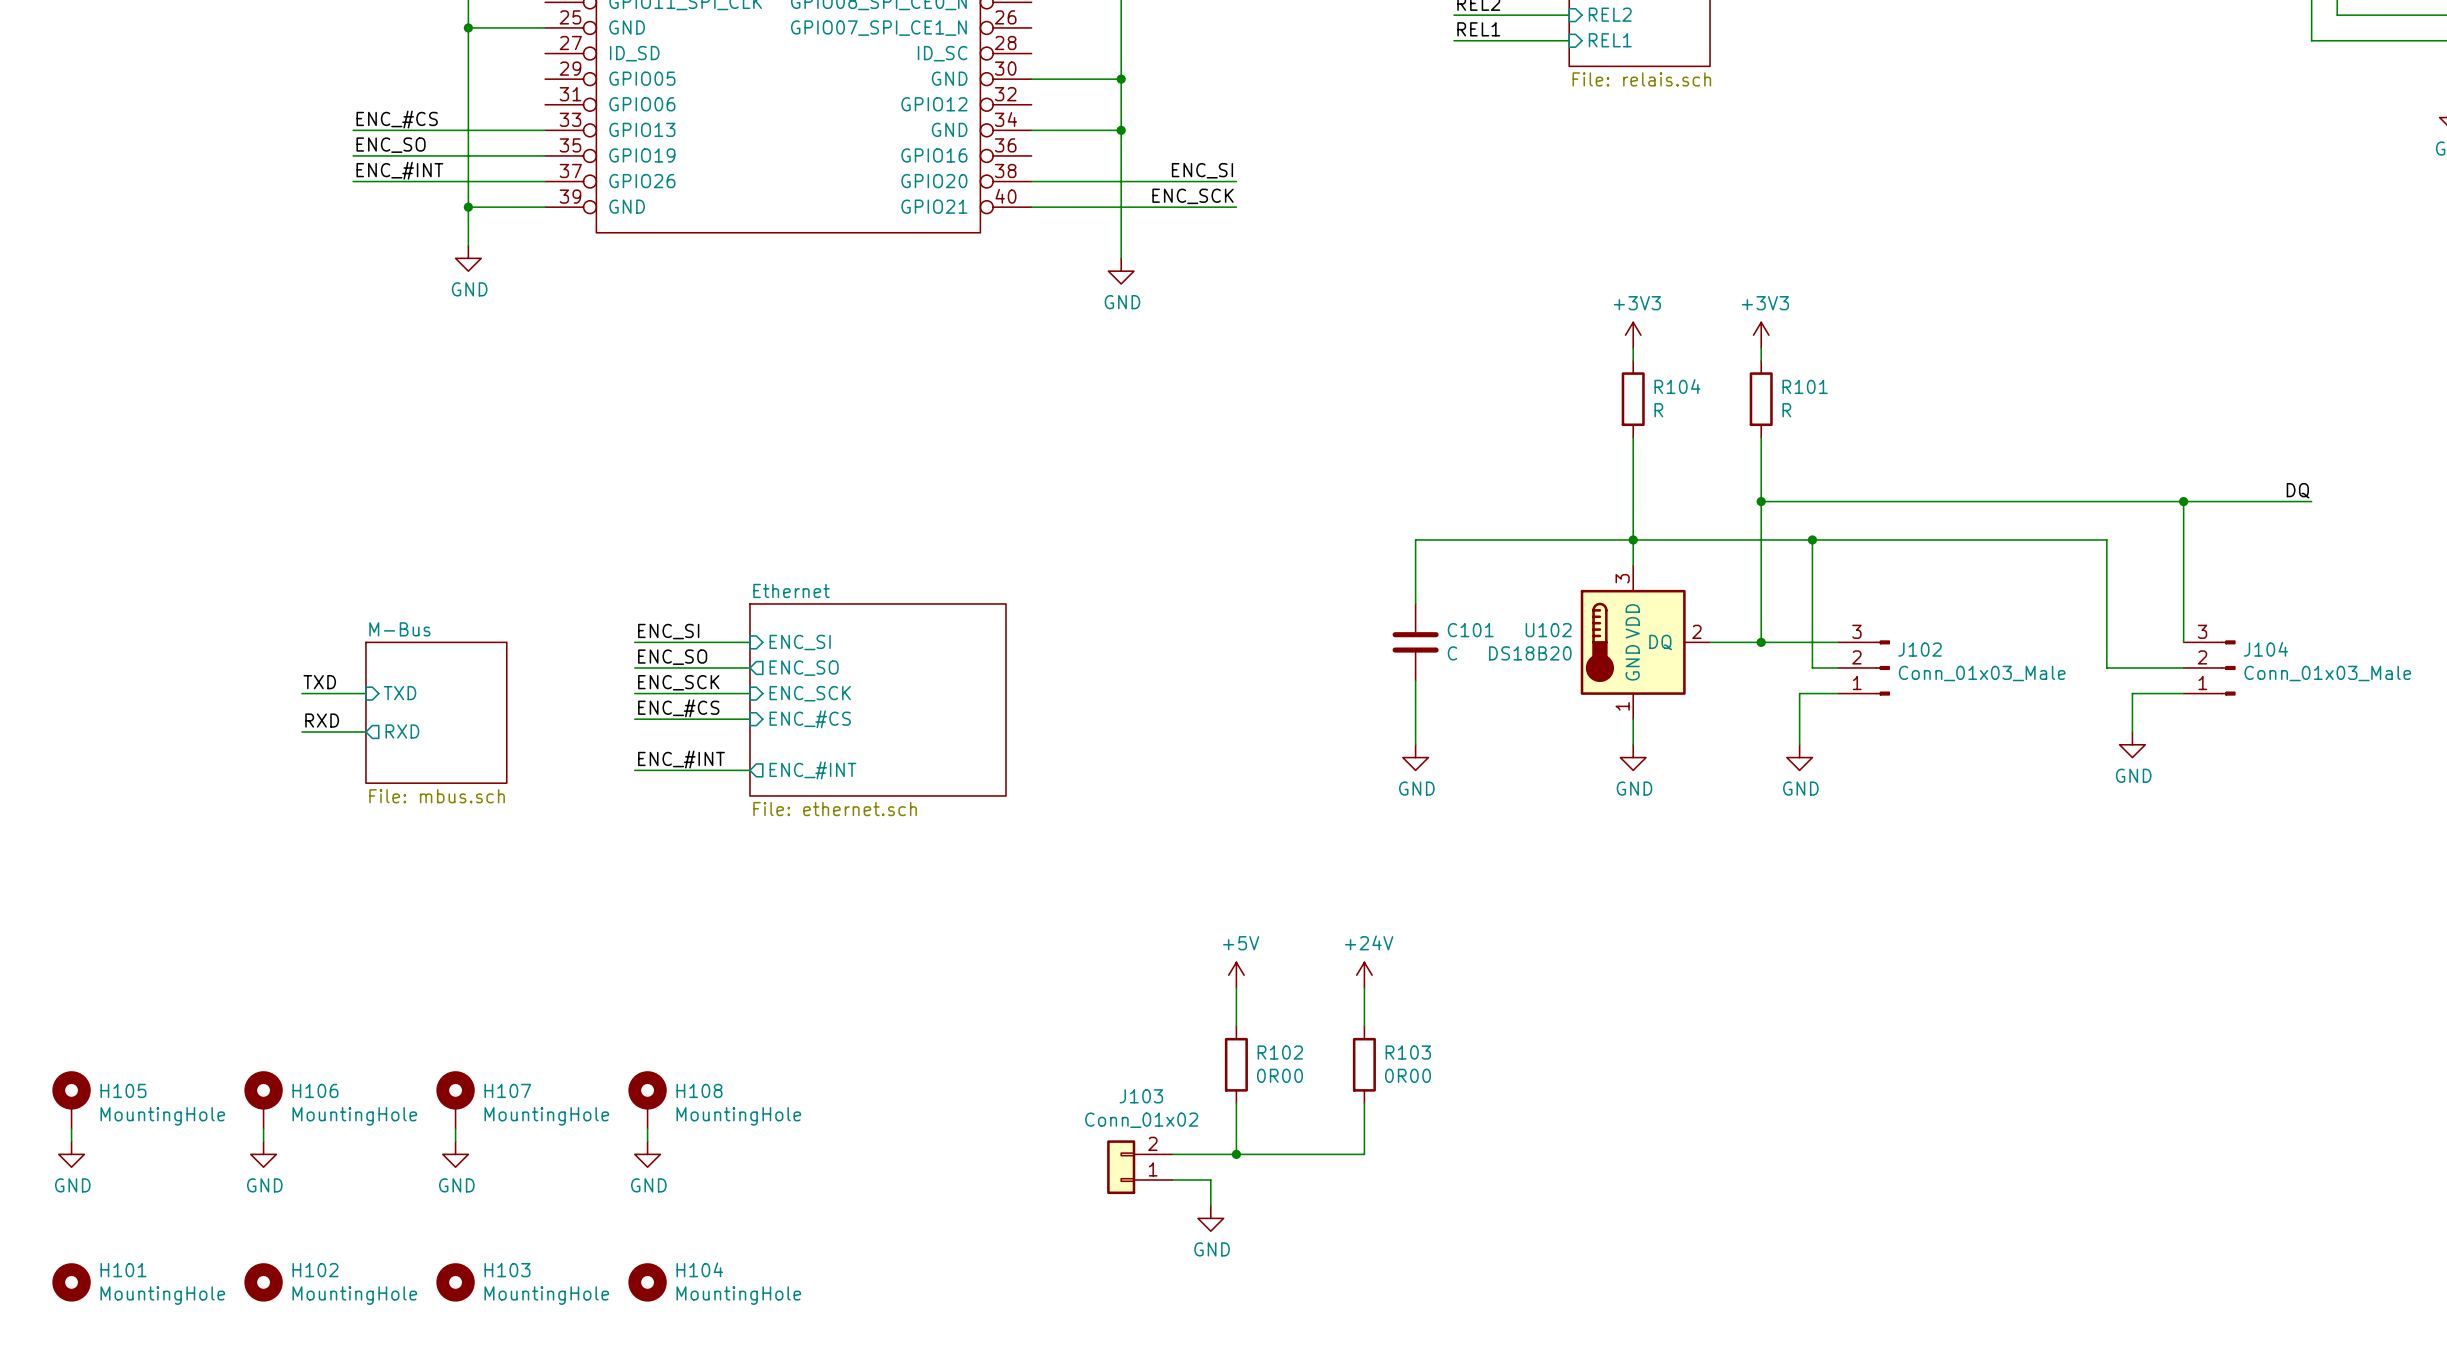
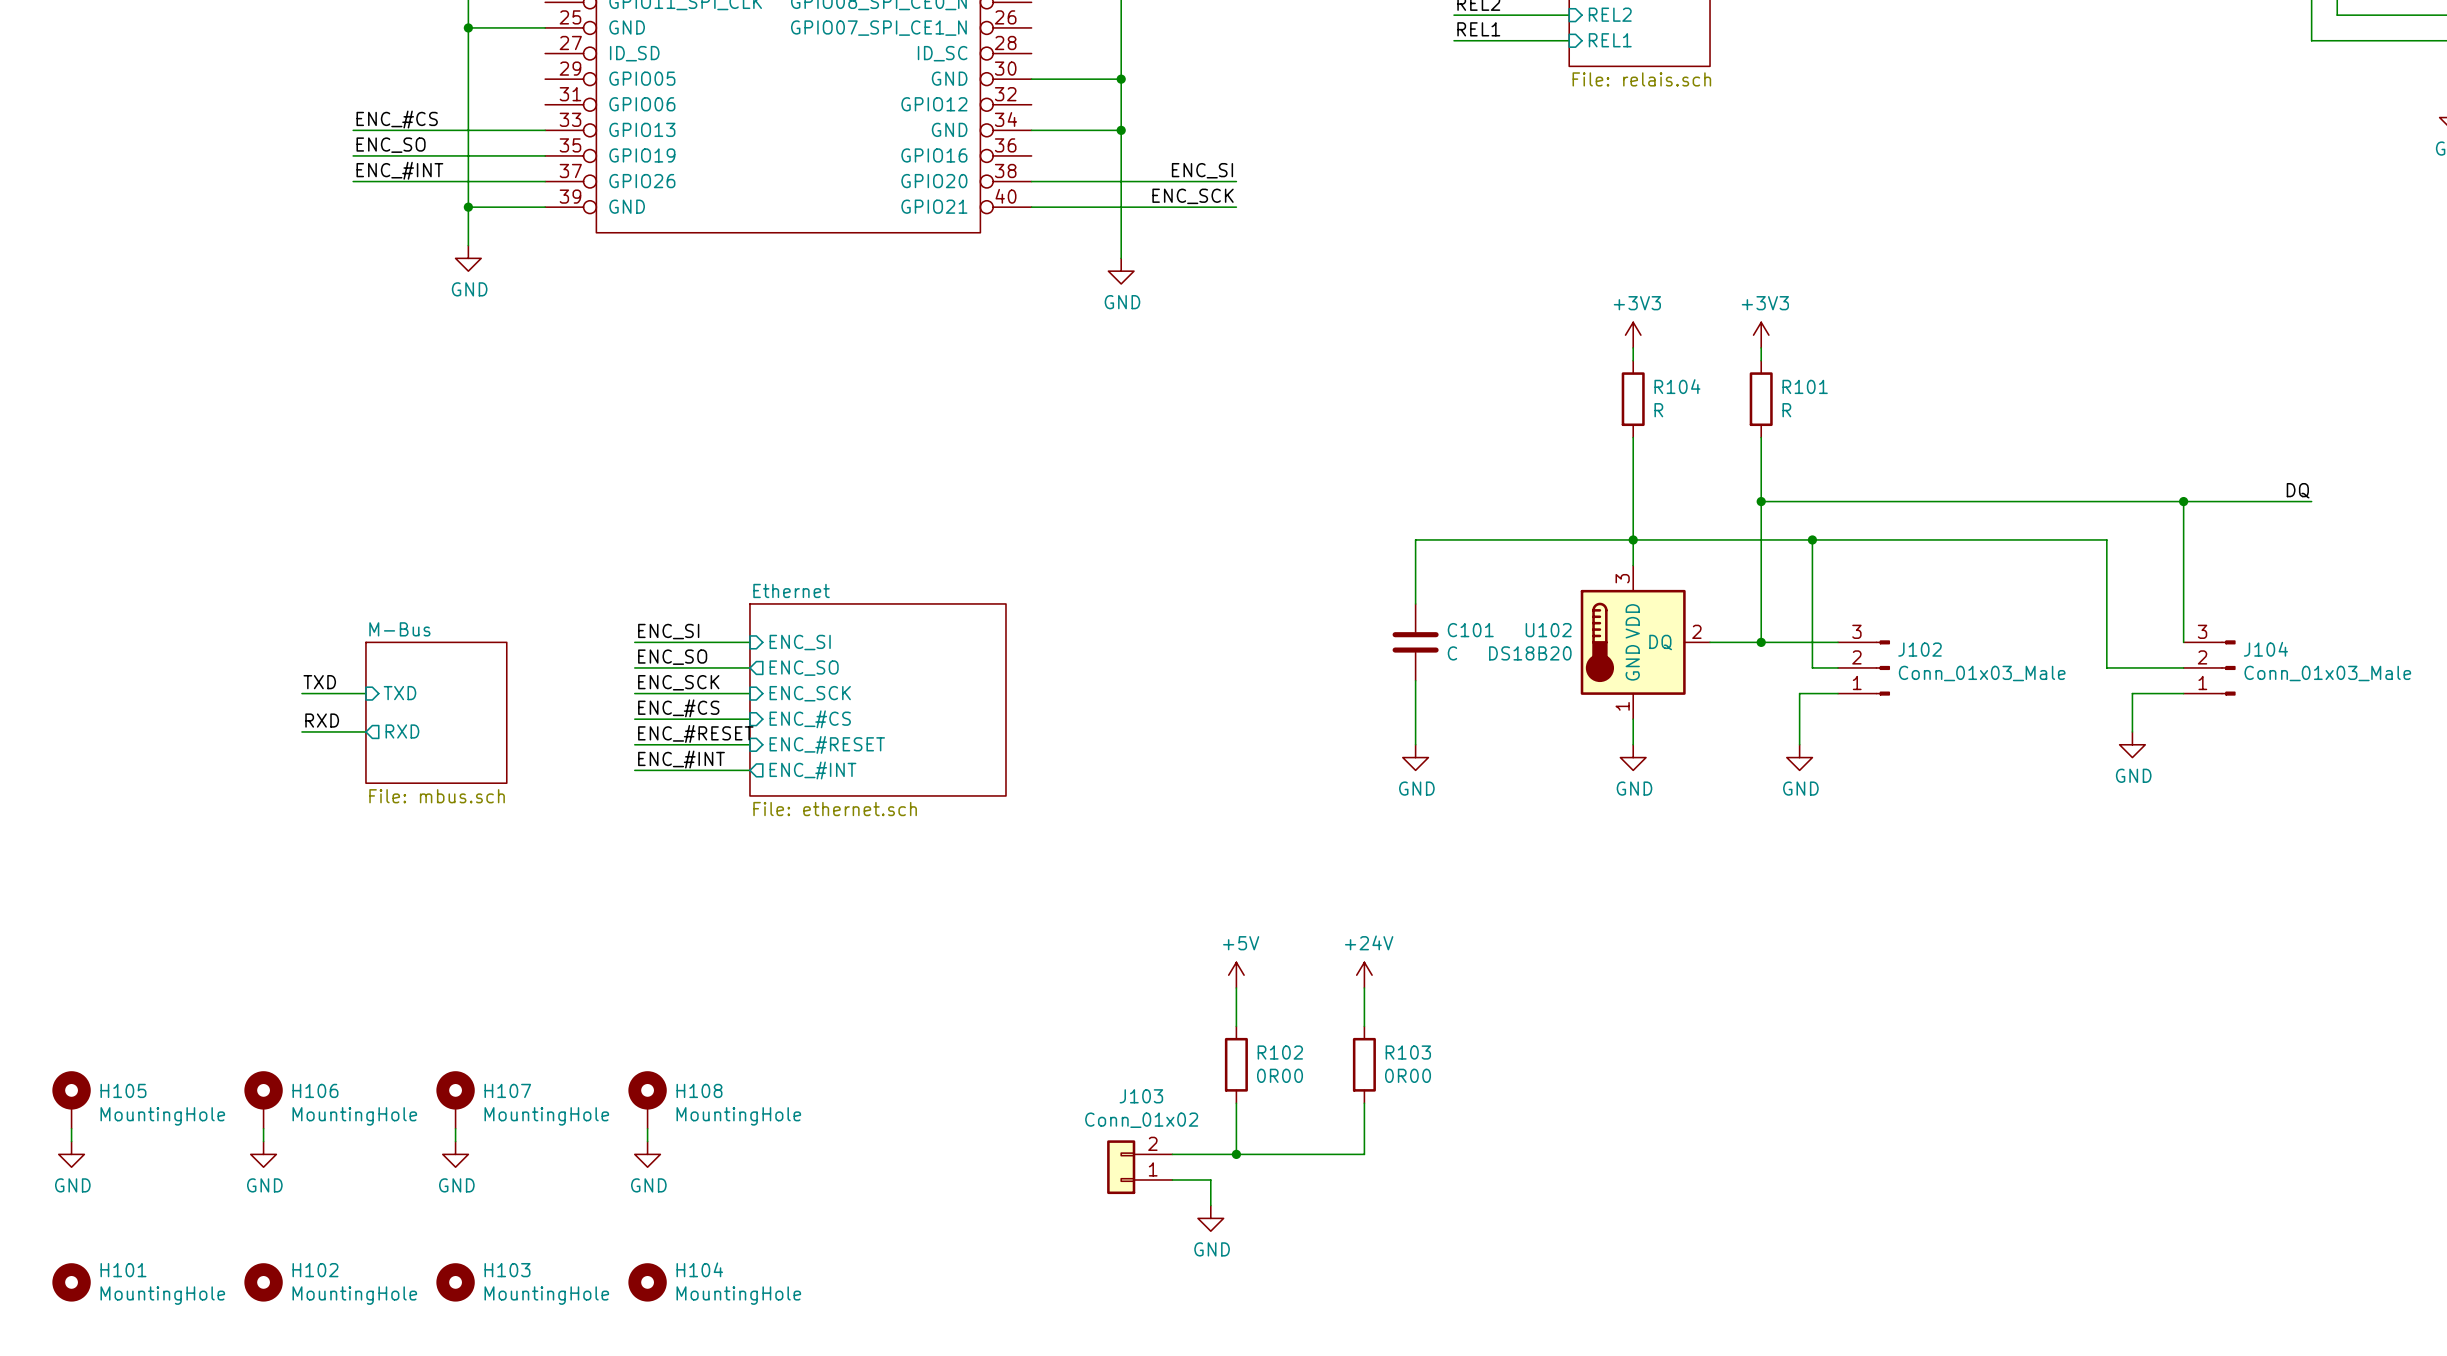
label: none -> ENC_#RESET (695, 733)
wire: none -> (634, 744) (749, 744)
sheet pin: none -> ENC_#RESET (827, 744)

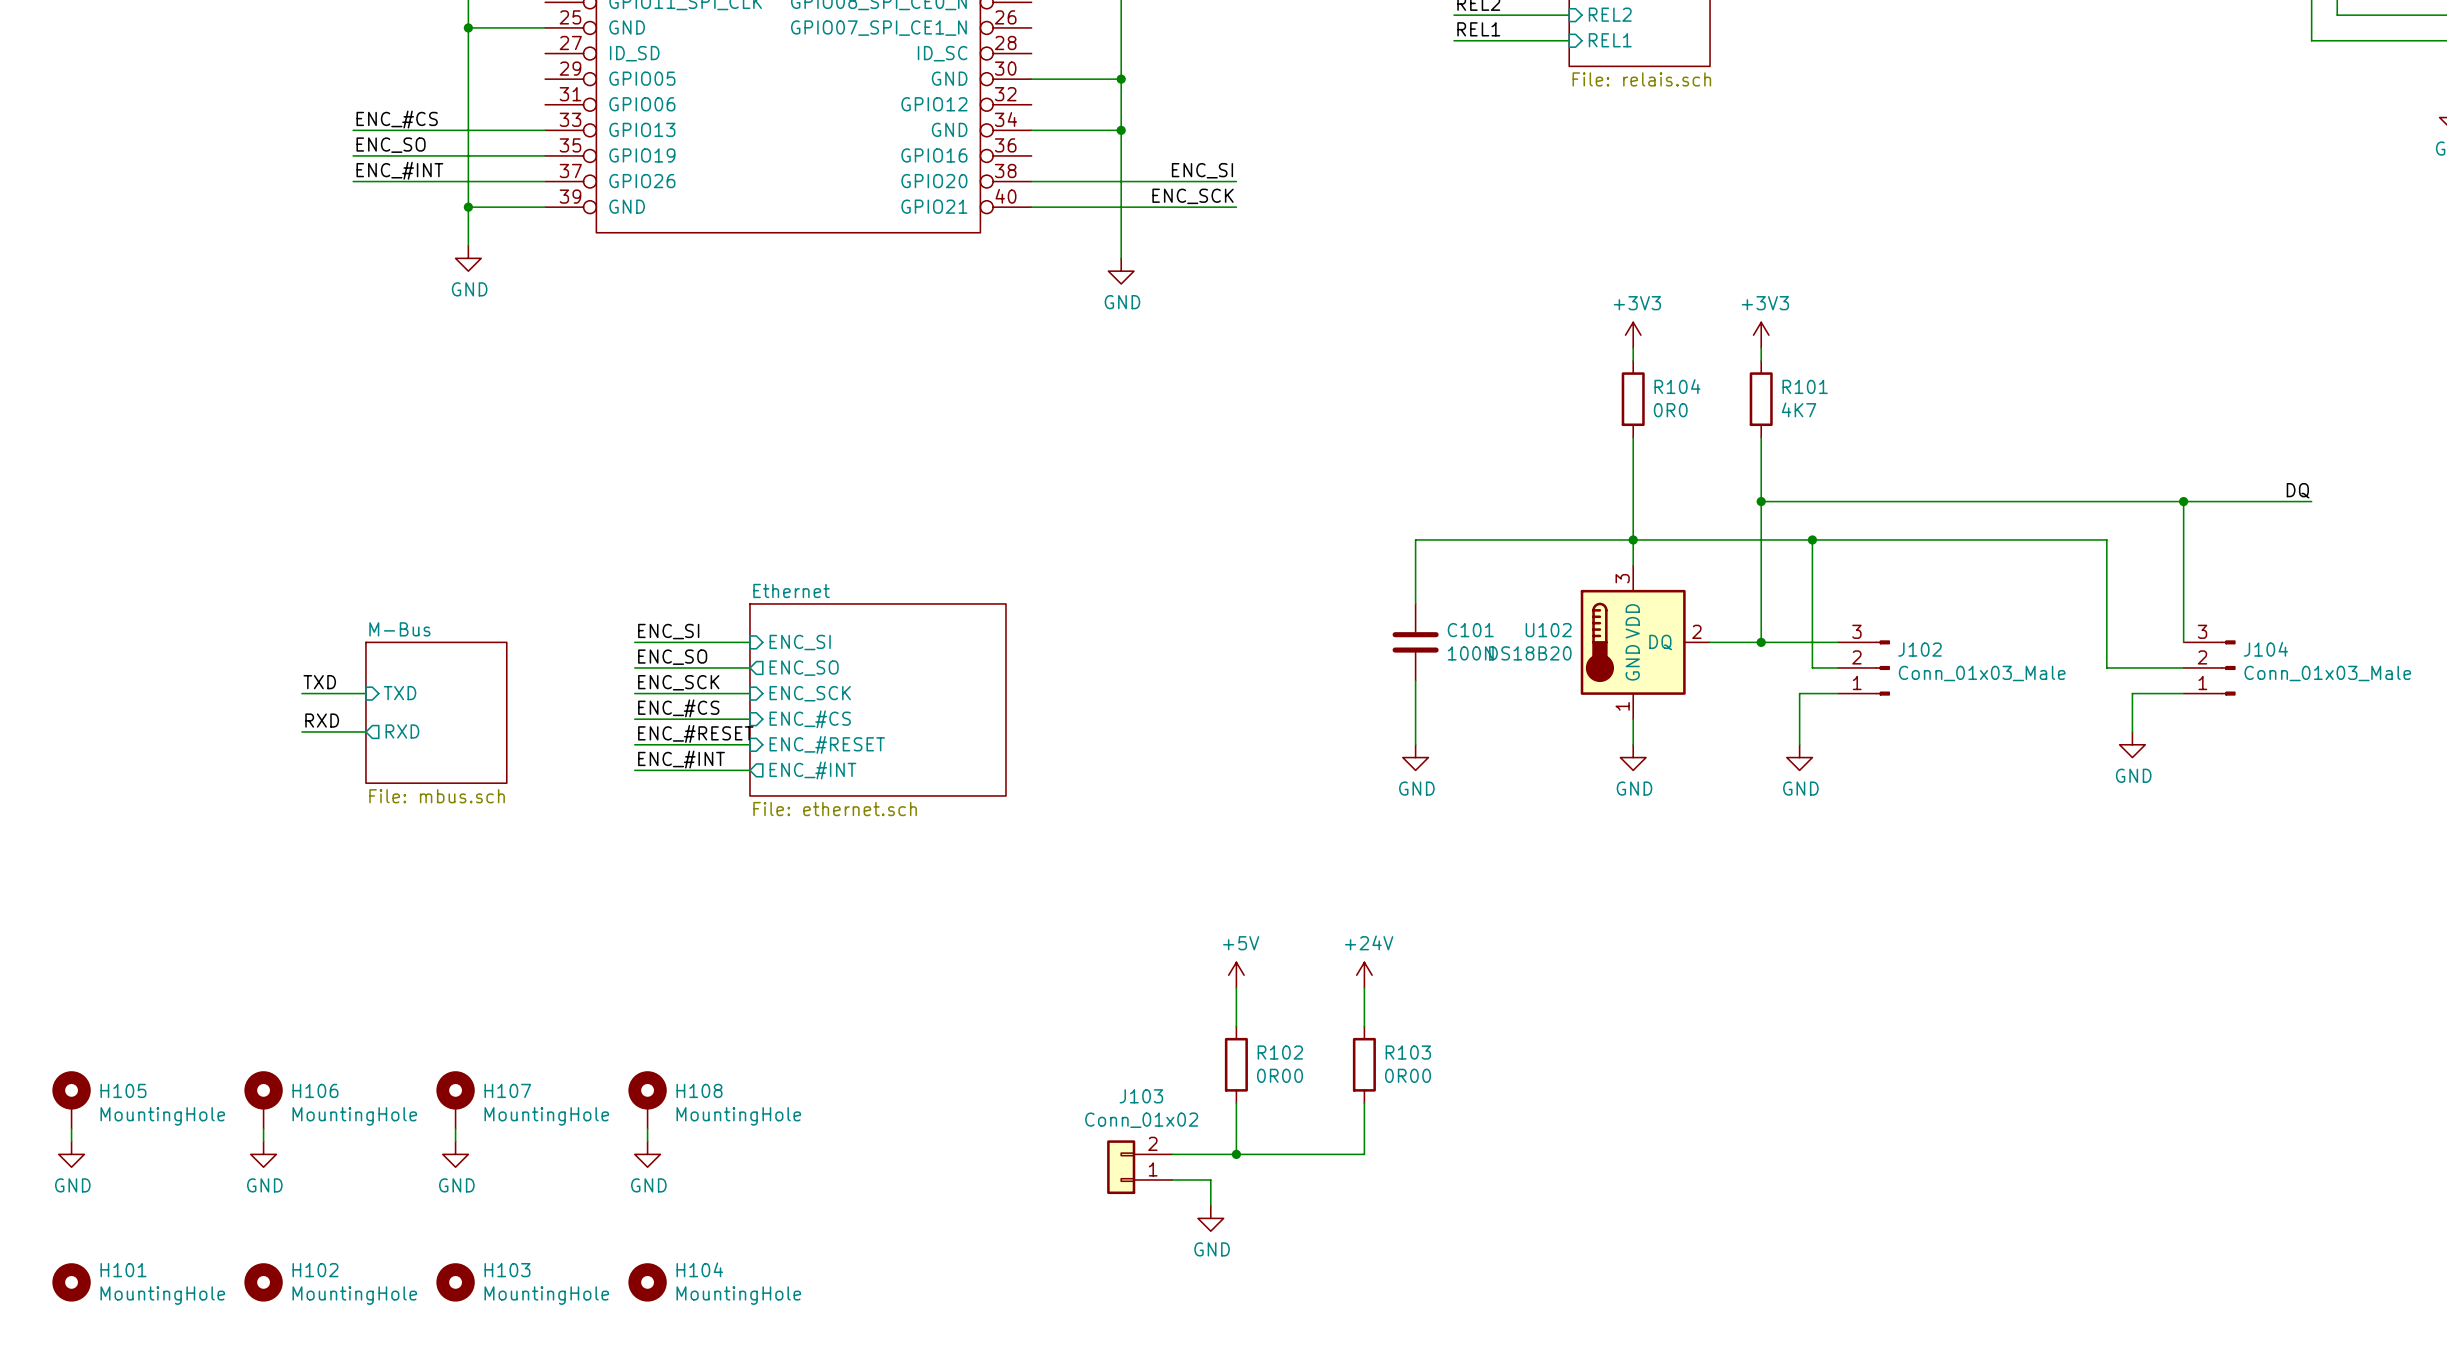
R104 value: R (1658, 410) -> 0R0 (1670, 410)
R101 value: R (1786, 410) -> 4K7 (1799, 409)
C101 value: C (1452, 653) -> 100N (1470, 653)

